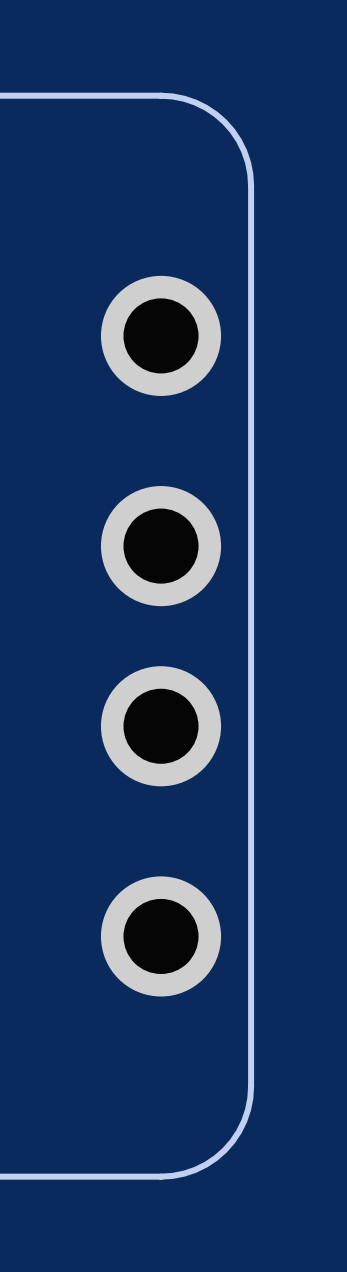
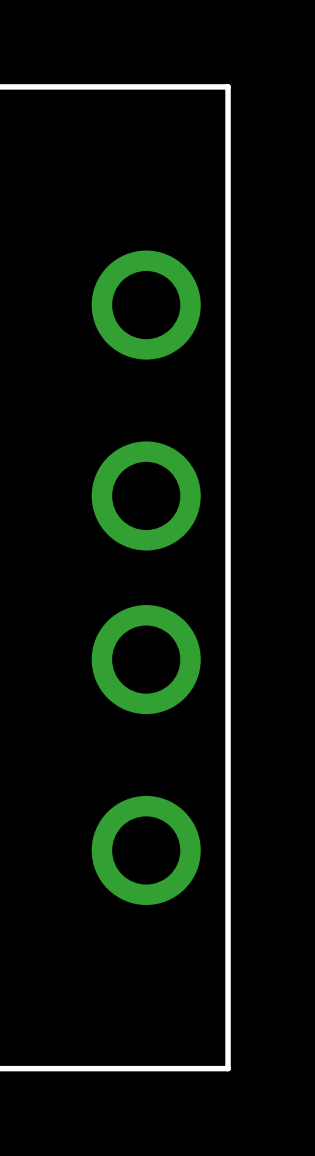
board edge: (161, 95) (184, 98) (195, 102) (206, 107) (224, 122) (239, 140) (244, 151) (250, 174) (251, 185) -> (146, 86) (228, 86) (228, 168)
board edge: (251, 1086) (250, 1098) (244, 1121) (239, 1131) (224, 1150) (206, 1164) (195, 1169) (172, 1175) (161, 1176) -> (228, 986) (228, 1068) (146, 1068)

